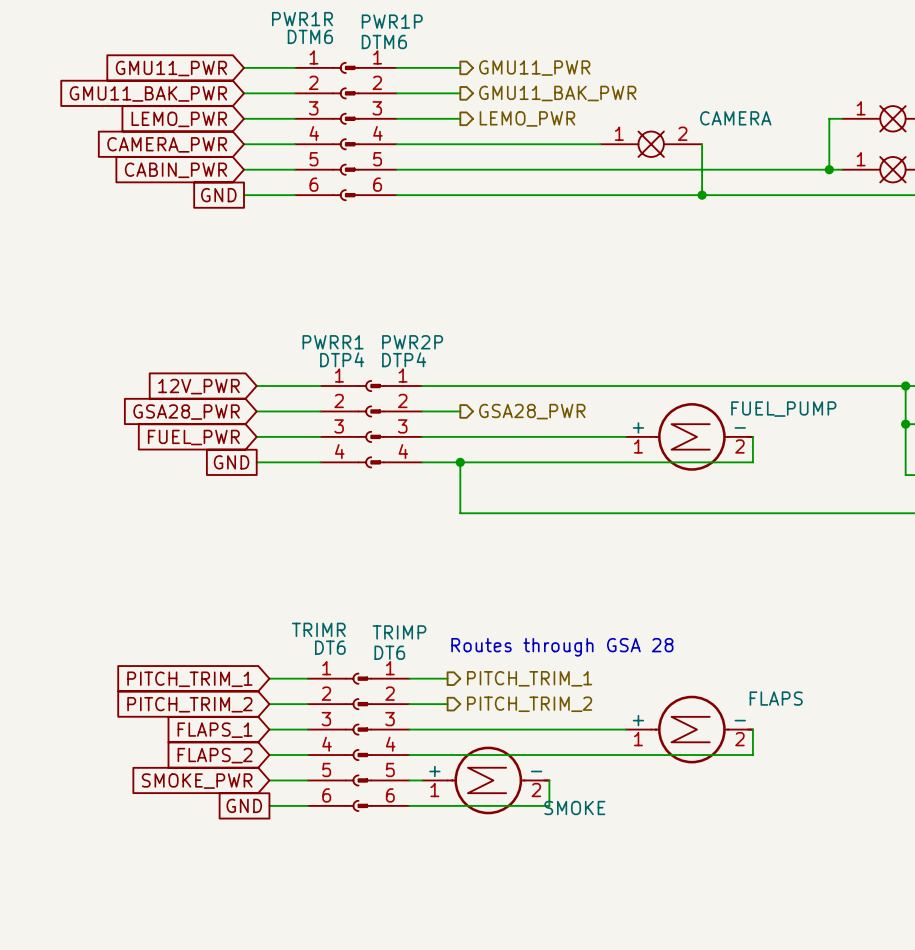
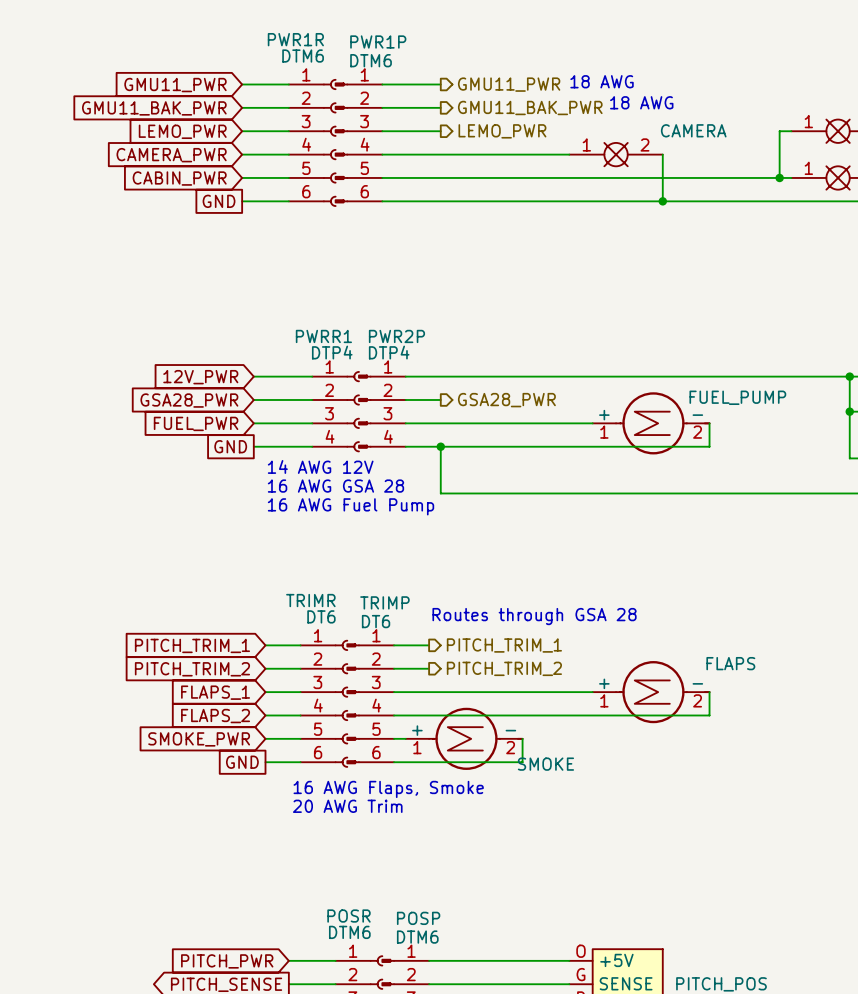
text: none -> 18 AWG (602, 81)
text: none -> 18 AWG (641, 102)
text: none -> 14 AWG 12V (320, 466)
text: none -> 16 AWG GSA 28 (335, 486)
text: none -> 16 AWG Fuel Pump (351, 506)
text: none -> 16 AWG Flaps, Smoke (388, 789)
text: none -> 20 AWG Trim (347, 806)

